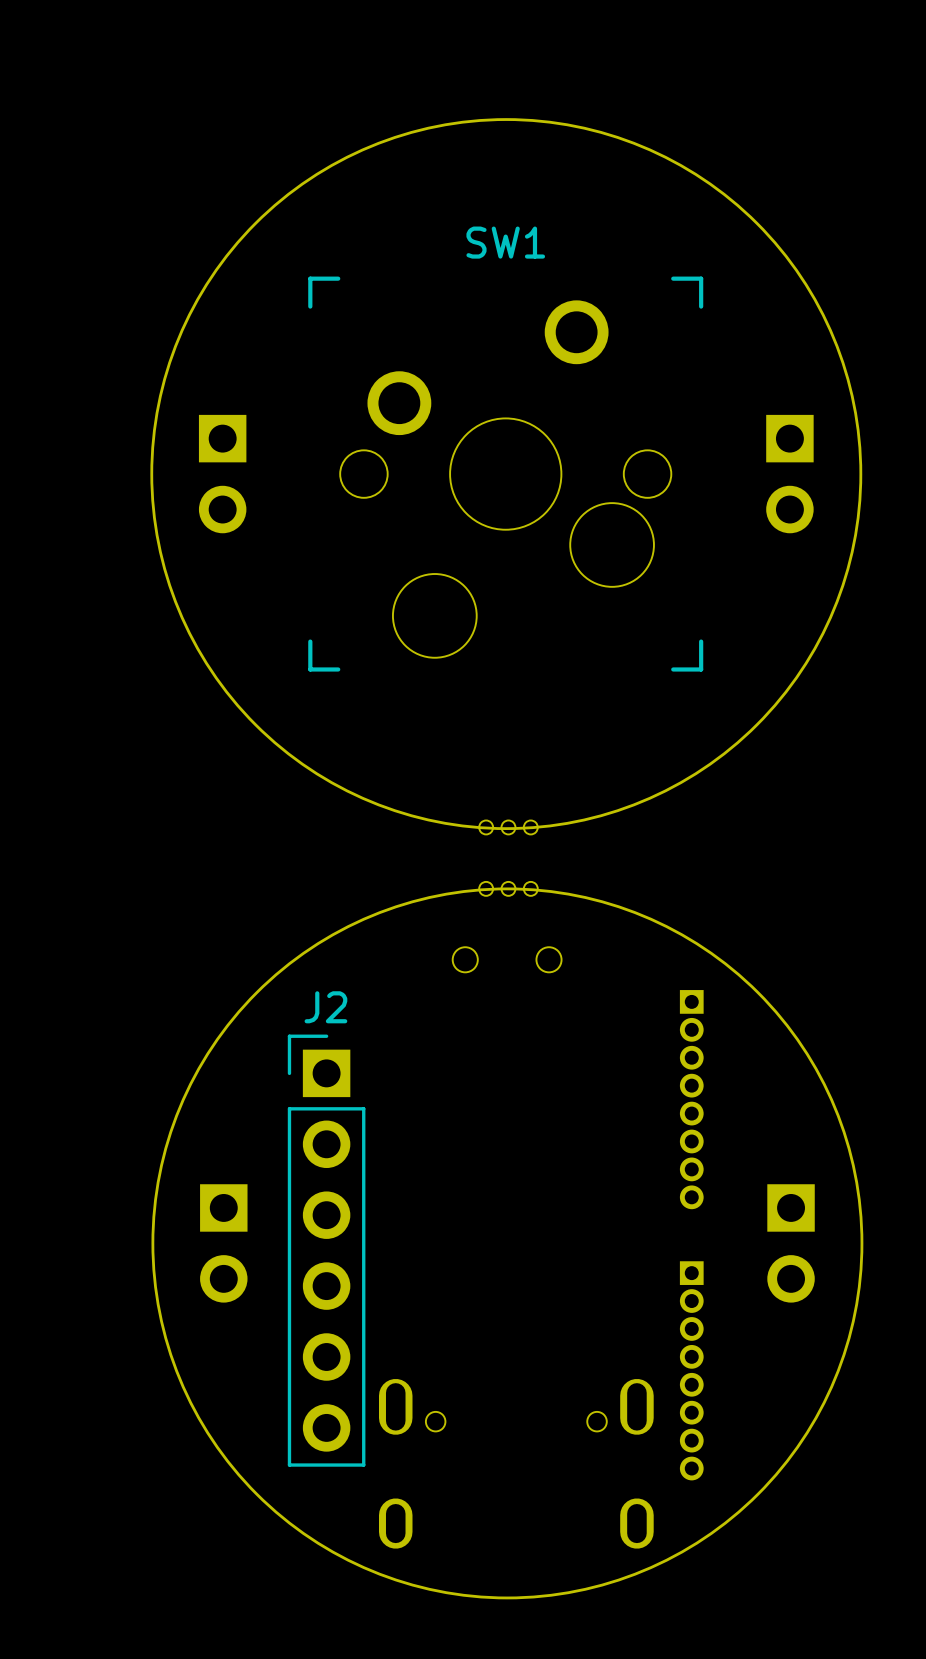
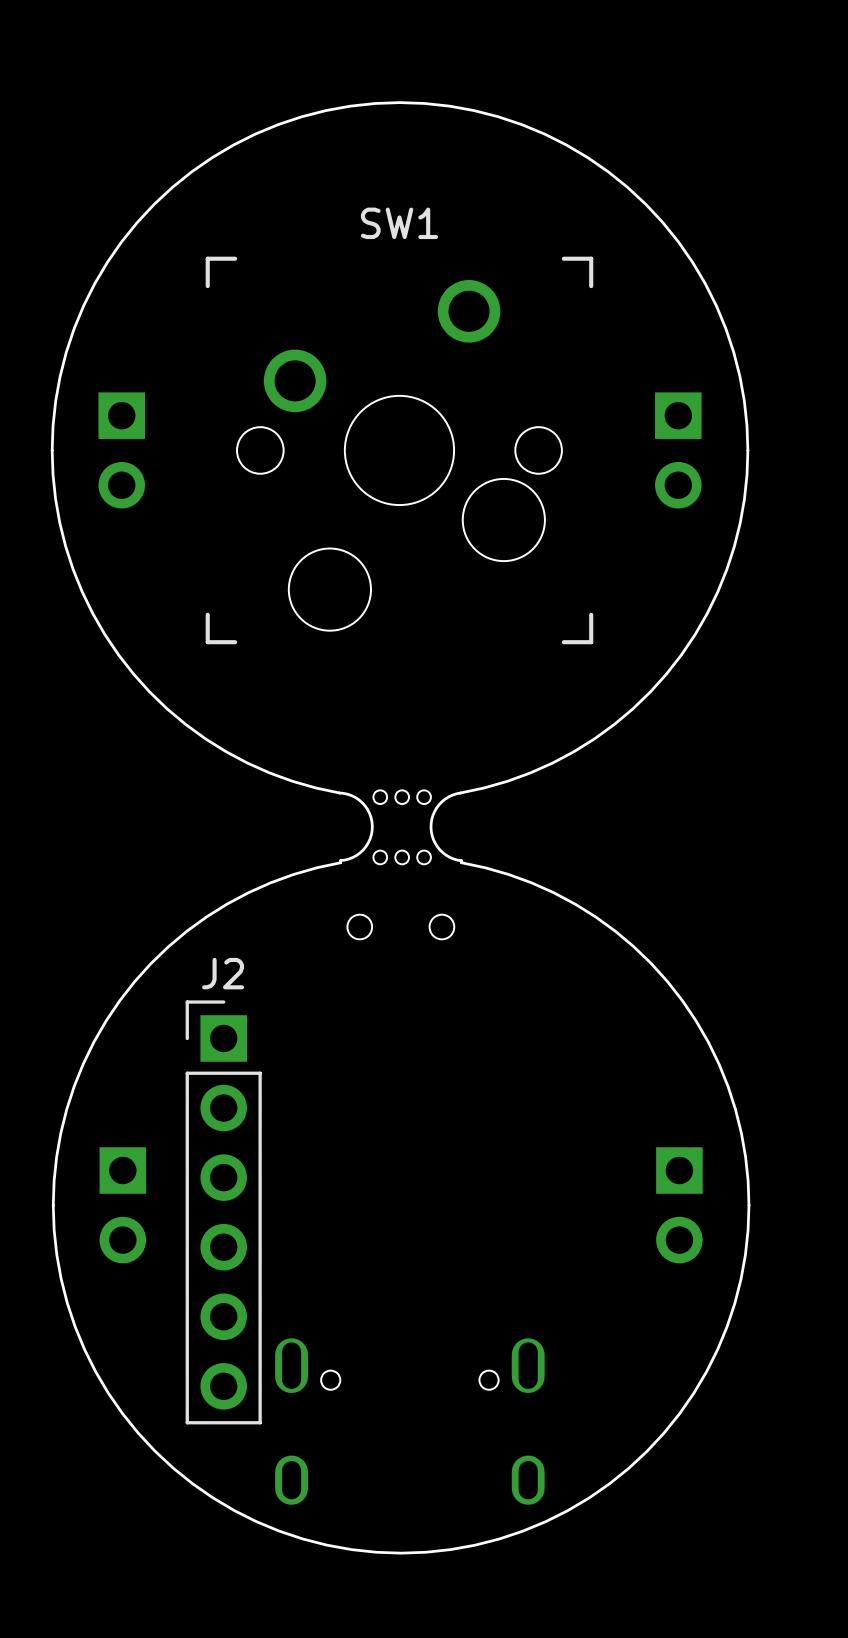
round board edge: [150, 118, 863, 831] -> none
board edge: none -> (747, 450) (744, 498) (734, 546) (726, 569) (707, 613) (681, 654) (666, 674) (650, 692) (614, 724) (574, 751) (530, 772) (484, 787) (456, 793) (445, 799) (434, 811) (430, 827) (437, 846) (449, 857) (461, 860) (461, 862) (508, 874) (553, 892) (575, 904) (615, 931) (633, 946) (667, 981) (696, 1020) (708, 1042) (728, 1086) (735, 1109) (745, 1156) (748, 1205) (748, 1230) (741, 1279) (734, 1303) (717, 1349) (693, 1393) (679, 1413) (647, 1451) (609, 1483) (589, 1497) (545, 1521) (522, 1531) (499, 1539) (450, 1549) (425, 1552) (376, 1552) (327, 1545) (303, 1539) (256, 1521) (234, 1510) (192, 1483) (155, 1451) (122, 1413) (95, 1372) (75, 1326) (61, 1279) (54, 1230) (53, 1205) (56, 1156) (66, 1109) (83, 1063) (106, 1020) (134, 981) (150, 963) (186, 931) (227, 904) (248, 892) (293, 874) (340, 862) (340, 860) (356, 855) (368, 842) (372, 830) (372, 821) (365, 806) (355, 797) (292, 781) (269, 772) (225, 751) (185, 724) (167, 708) (133, 673) (118, 654) (92, 613) (73, 569) (59, 522) (53, 474) (52, 450) (53, 425) (60, 376) (66, 352) (83, 305) (107, 262) (137, 222) (172, 187) (191, 171) (233, 145) (278, 124) (326, 110) (350, 106) (375, 103) (424, 103) (473, 110) (521, 124) (566, 145) (608, 171) (627, 187) (662, 222) (692, 262) (705, 283) (725, 328) (739, 376) (744, 400) (747, 450)
round board edge: [151, 887, 864, 1600] -> none
part: (691, 1099) -> none
part: (691, 1370) -> none

